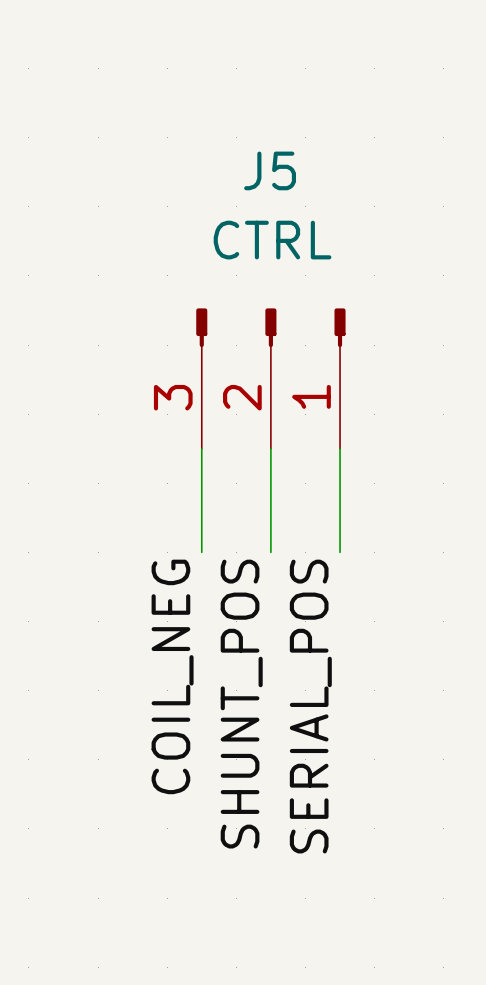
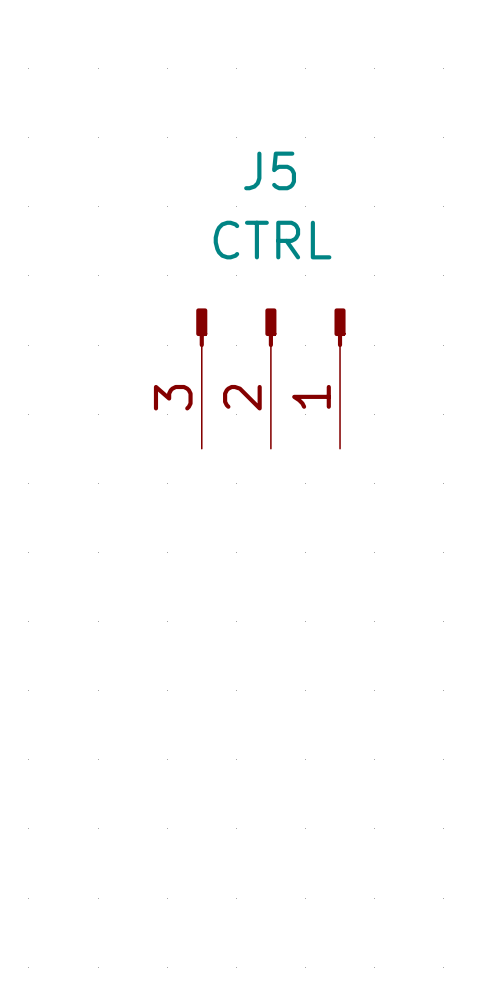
wire: (201, 448) (201, 552) -> none
wire: (270, 448) (270, 552) -> none
wire: (340, 448) (340, 552) -> none
label: COIL_NEG (172, 676) -> none
label: SHUNT_POS (241, 704) -> none
label: SERIAL_POS (310, 706) -> none

